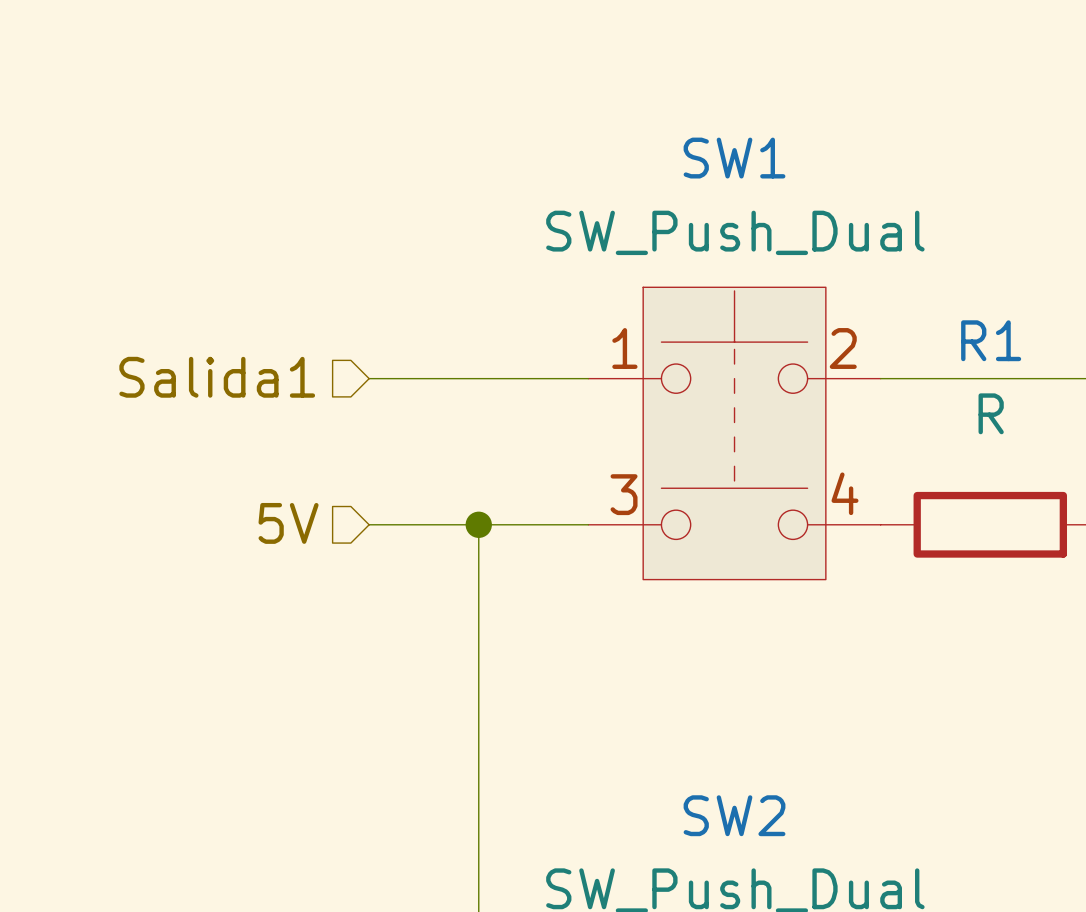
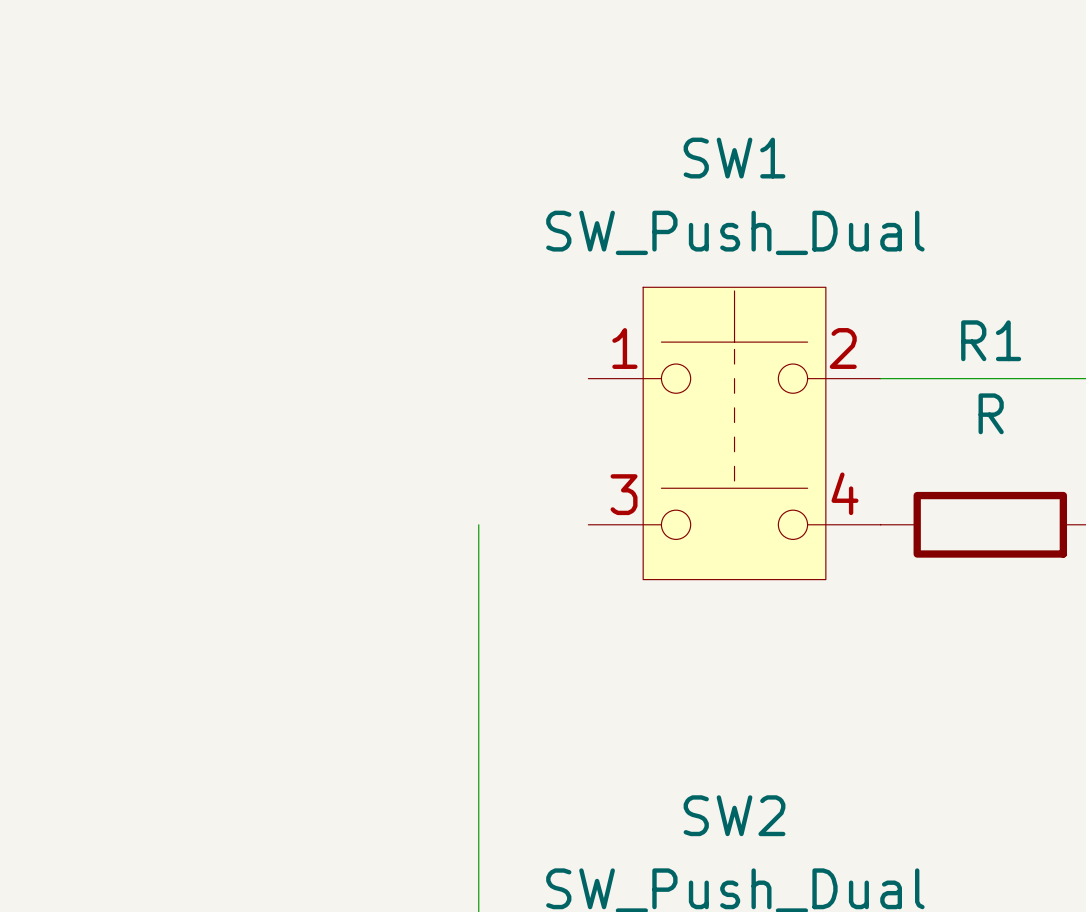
hierarchical label: Salida1 (217, 377) -> none
wire: (369, 378) (588, 378) -> none
hierarchical label: 5V (288, 523) -> none
wire: (369, 524) (588, 524) -> none
junction: (478, 524) -> none

